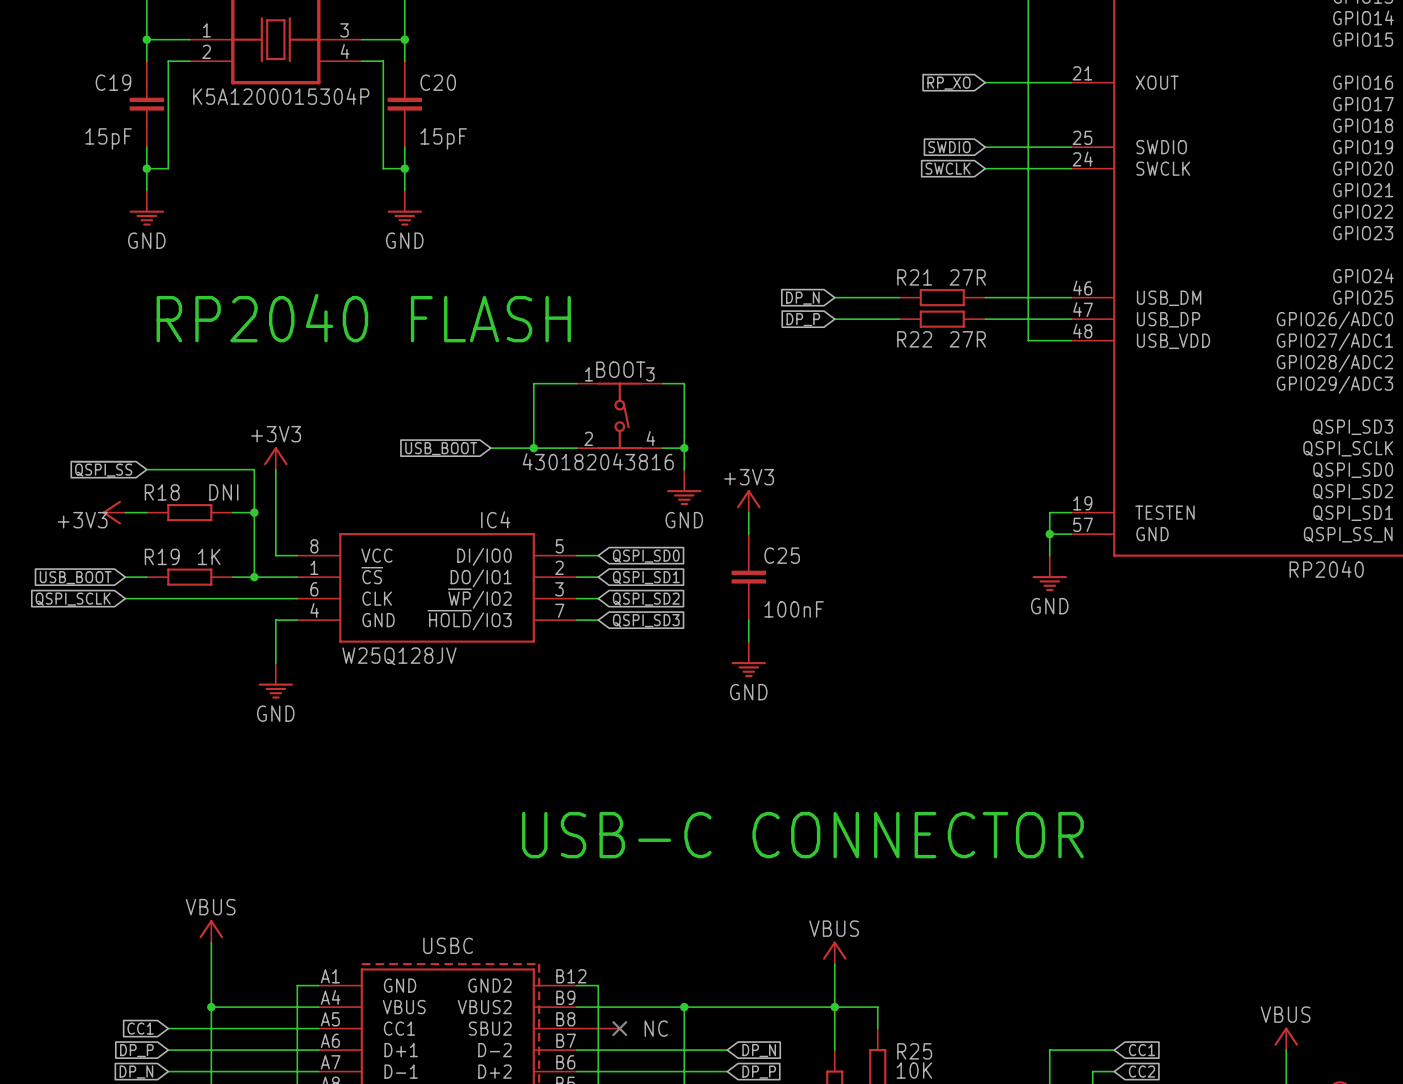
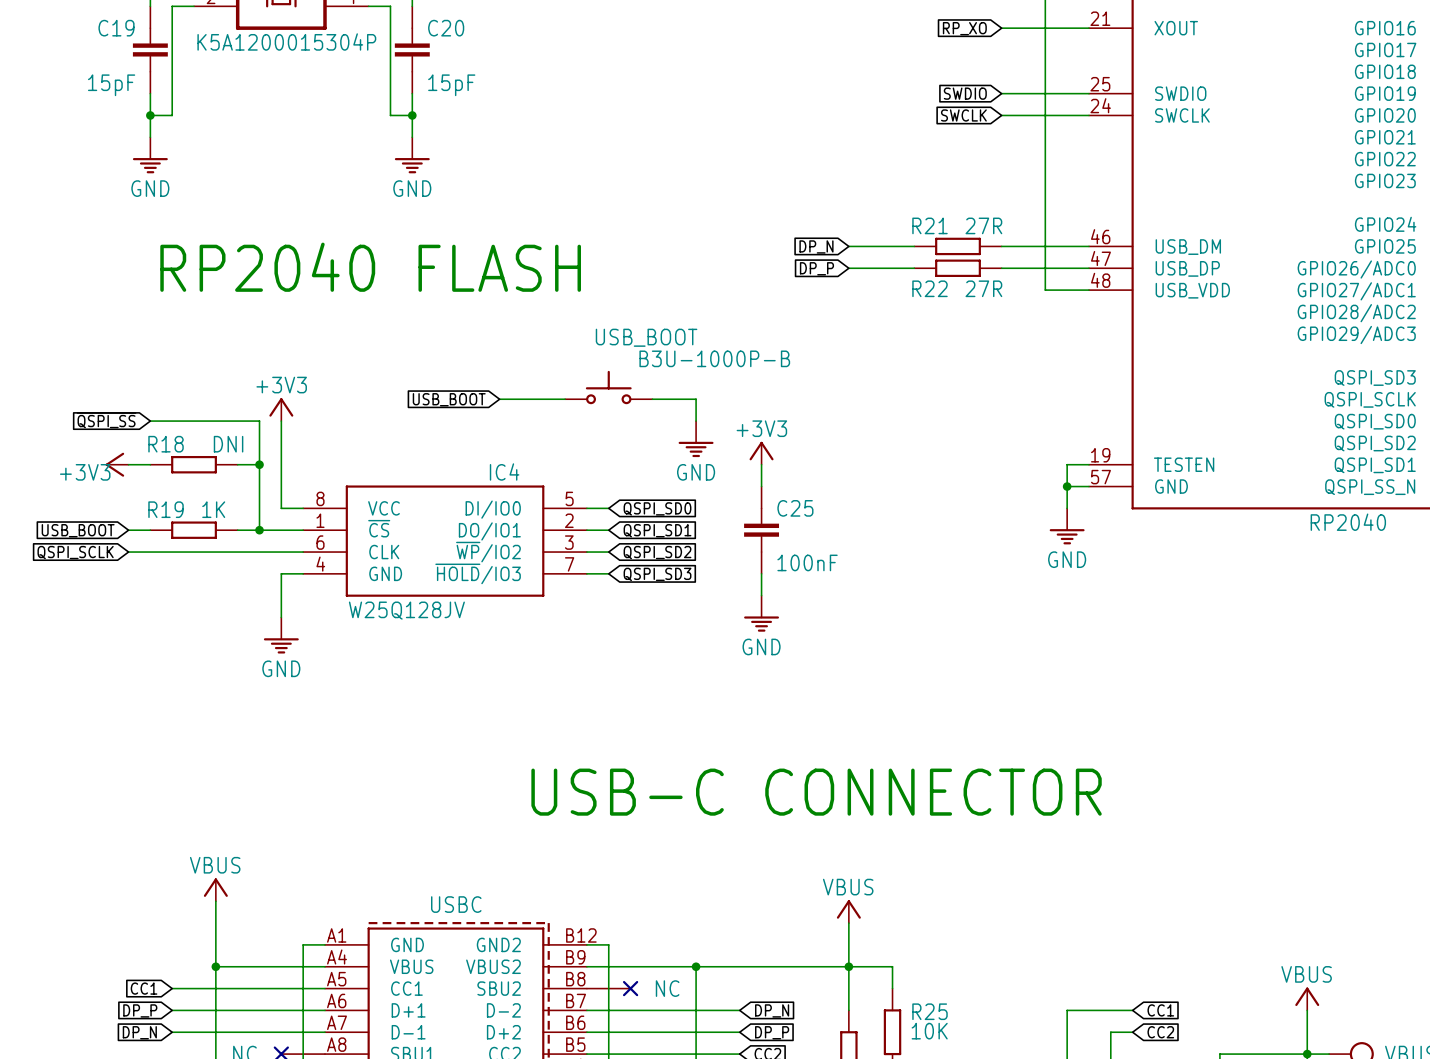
wire: (576, 383) (533, 383) (533, 448) -> none
wire: (662, 383) (684, 383) (684, 448) -> none
BOOT: 430182043816 (619, 415) -> none
USB_BOOT: none -> B3U-1000P-B (608, 387)
junction: (533, 448) -> none
junction: (684, 448) -> none

